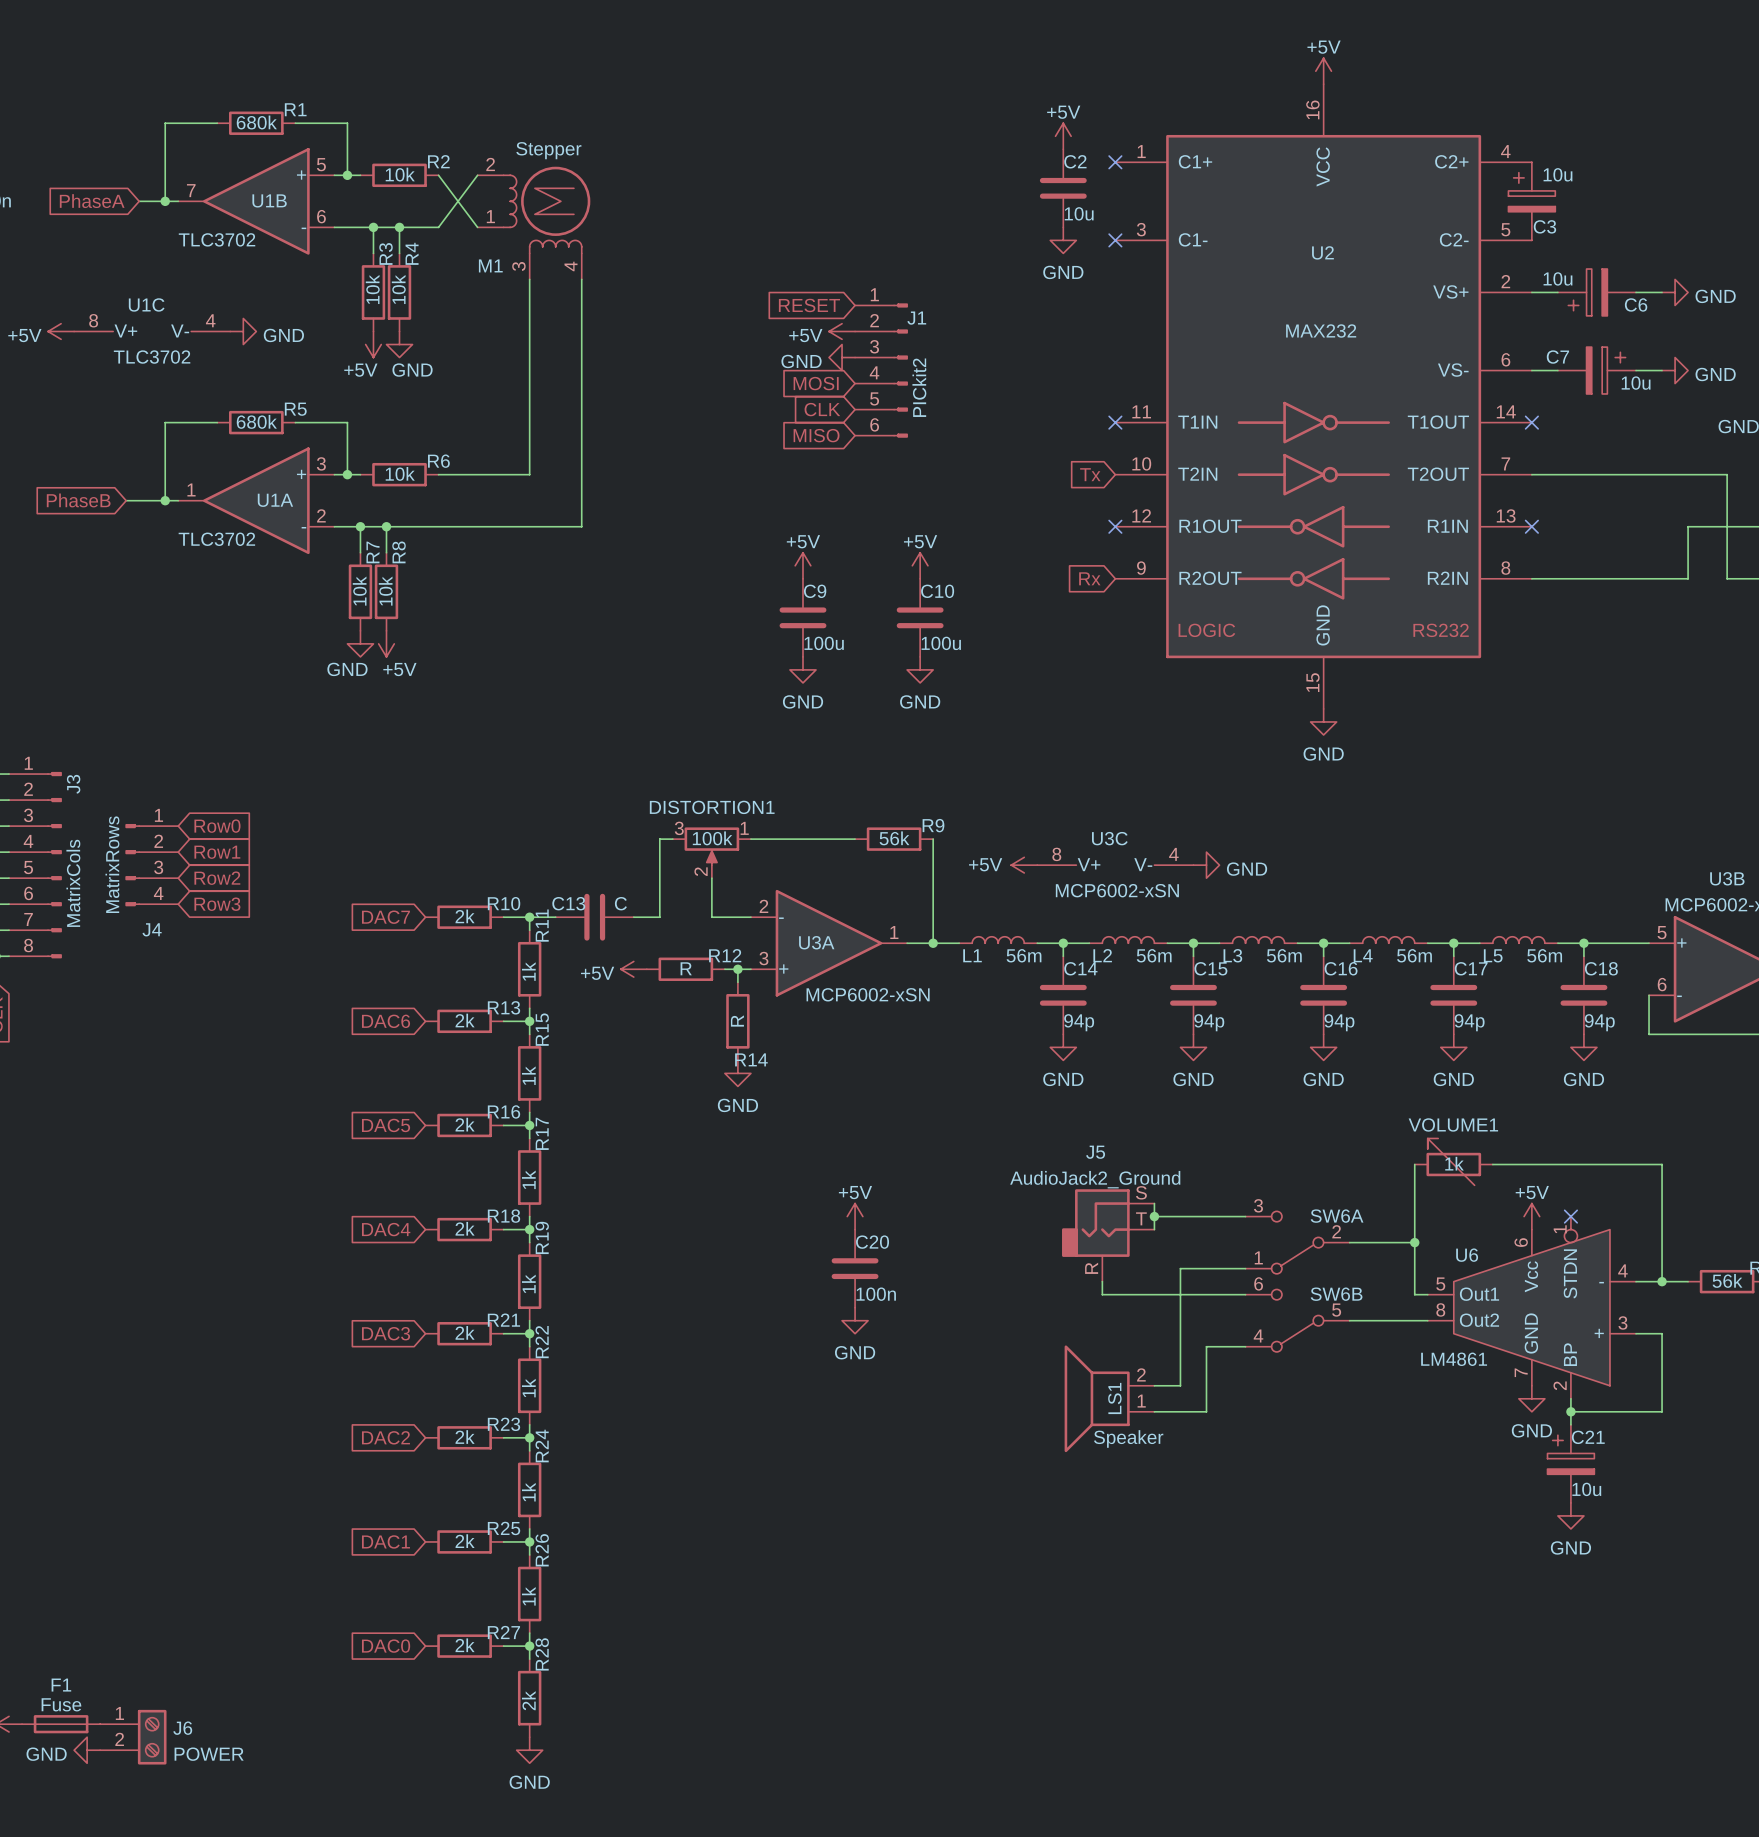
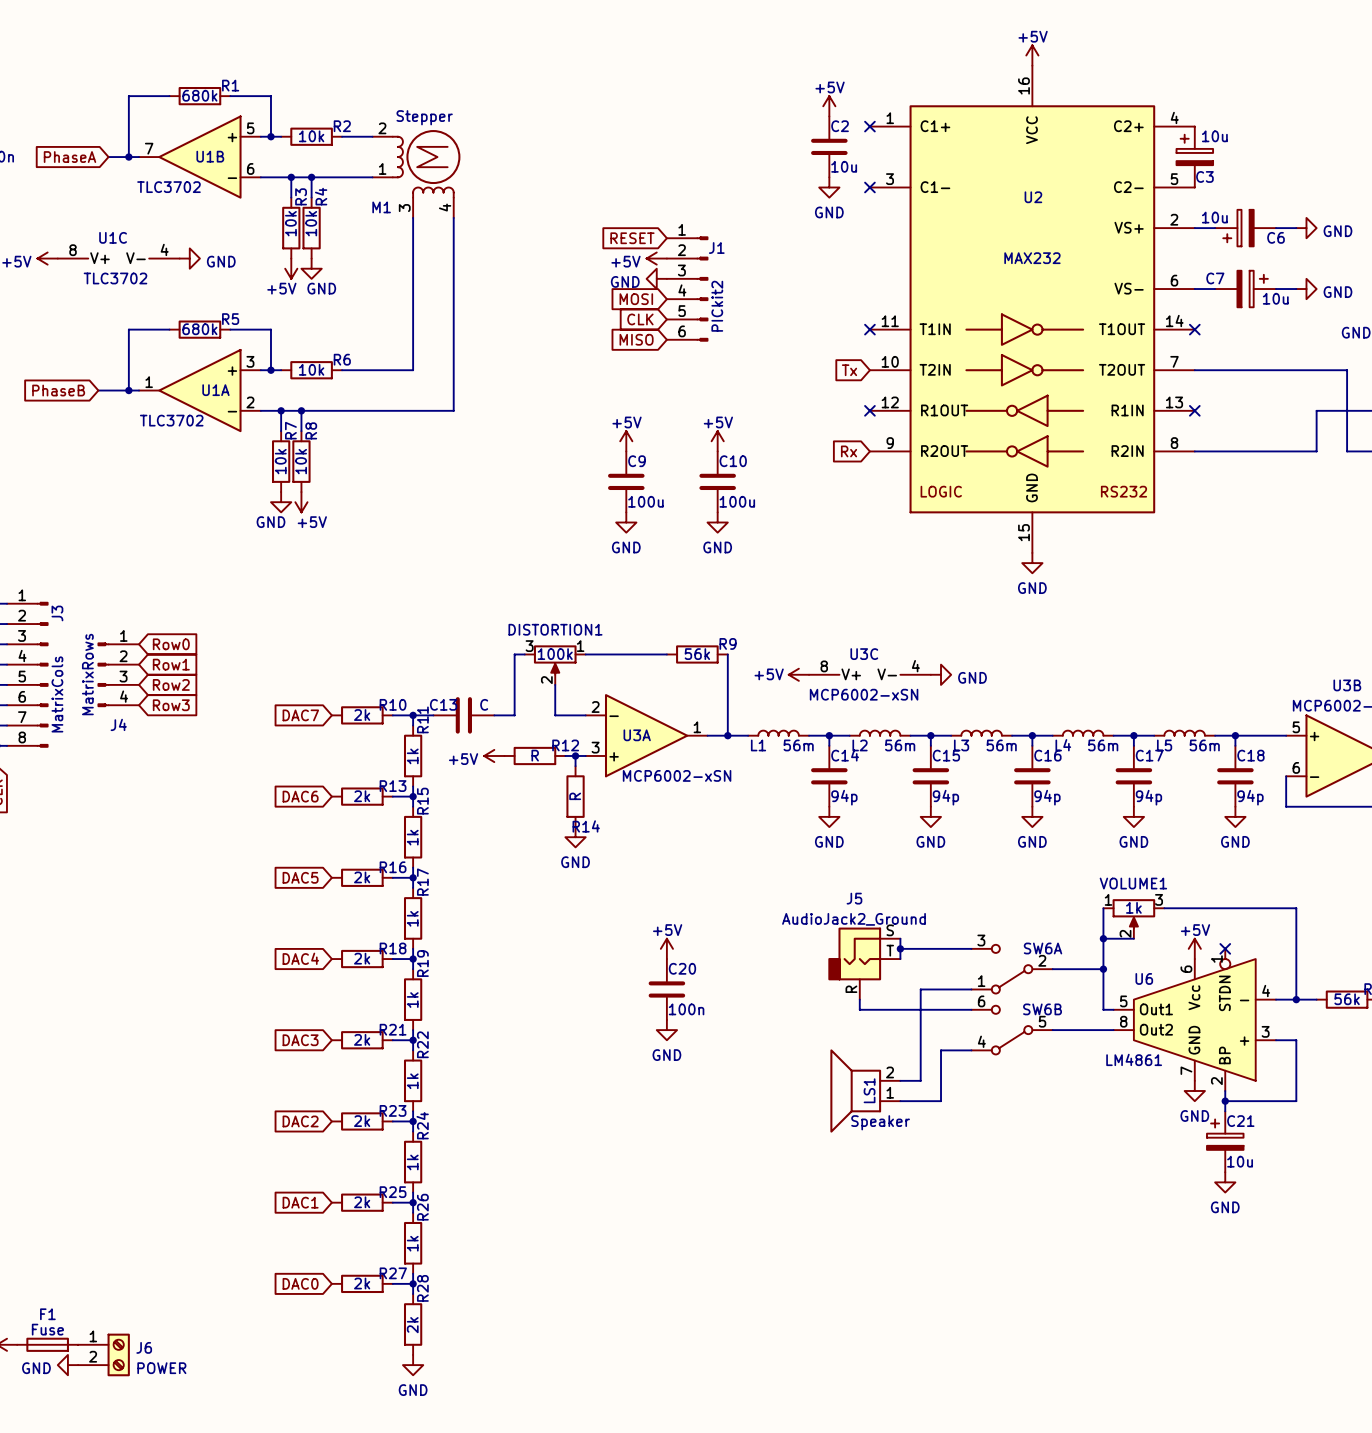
wire: (438, 175) (477, 227) -> (342, 136) (372, 136)
wire: (477, 175) (438, 227) -> (372, 177) (342, 177)
VOLUME1 symbol: [1414, 1138, 1493, 1186] -> [1103, 899, 1165, 939]
wire: none -> (1103, 938) (1133, 938)
junction: none -> (1103, 938)

